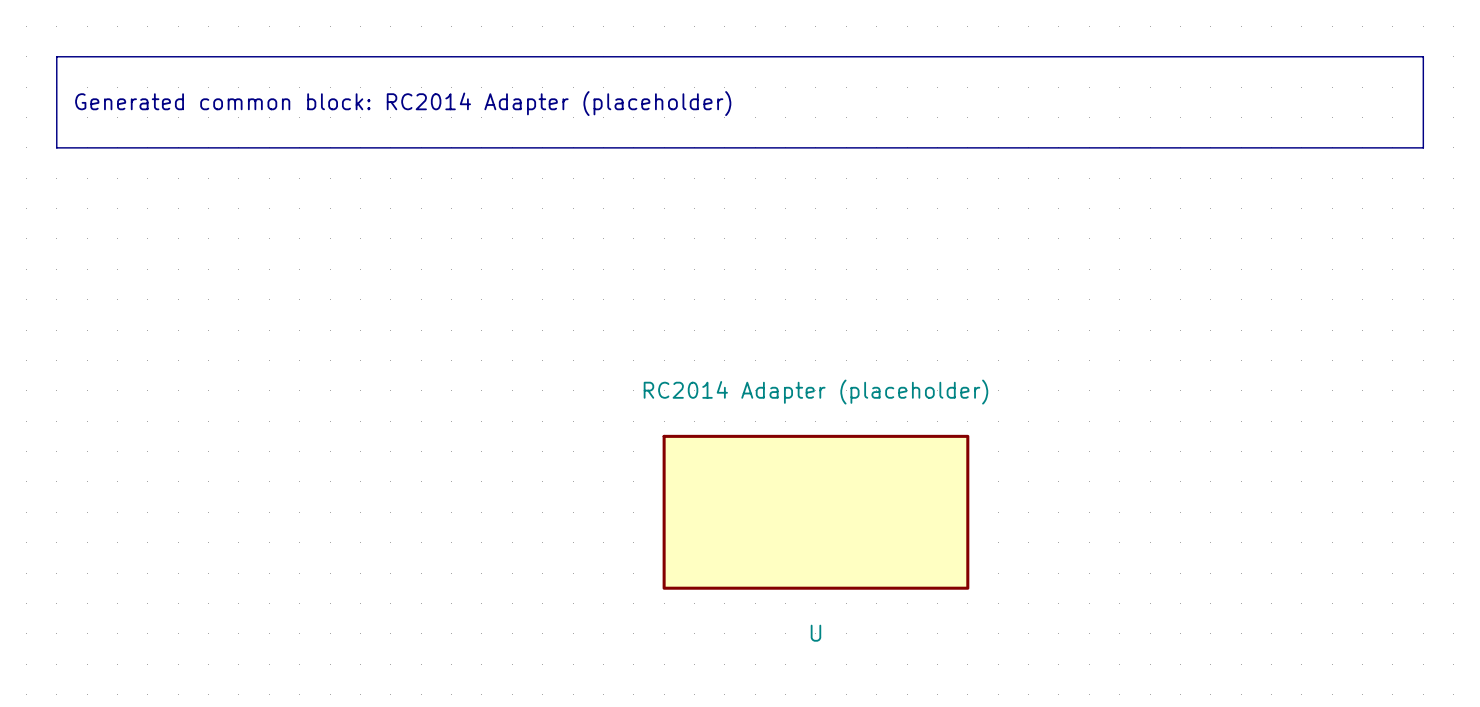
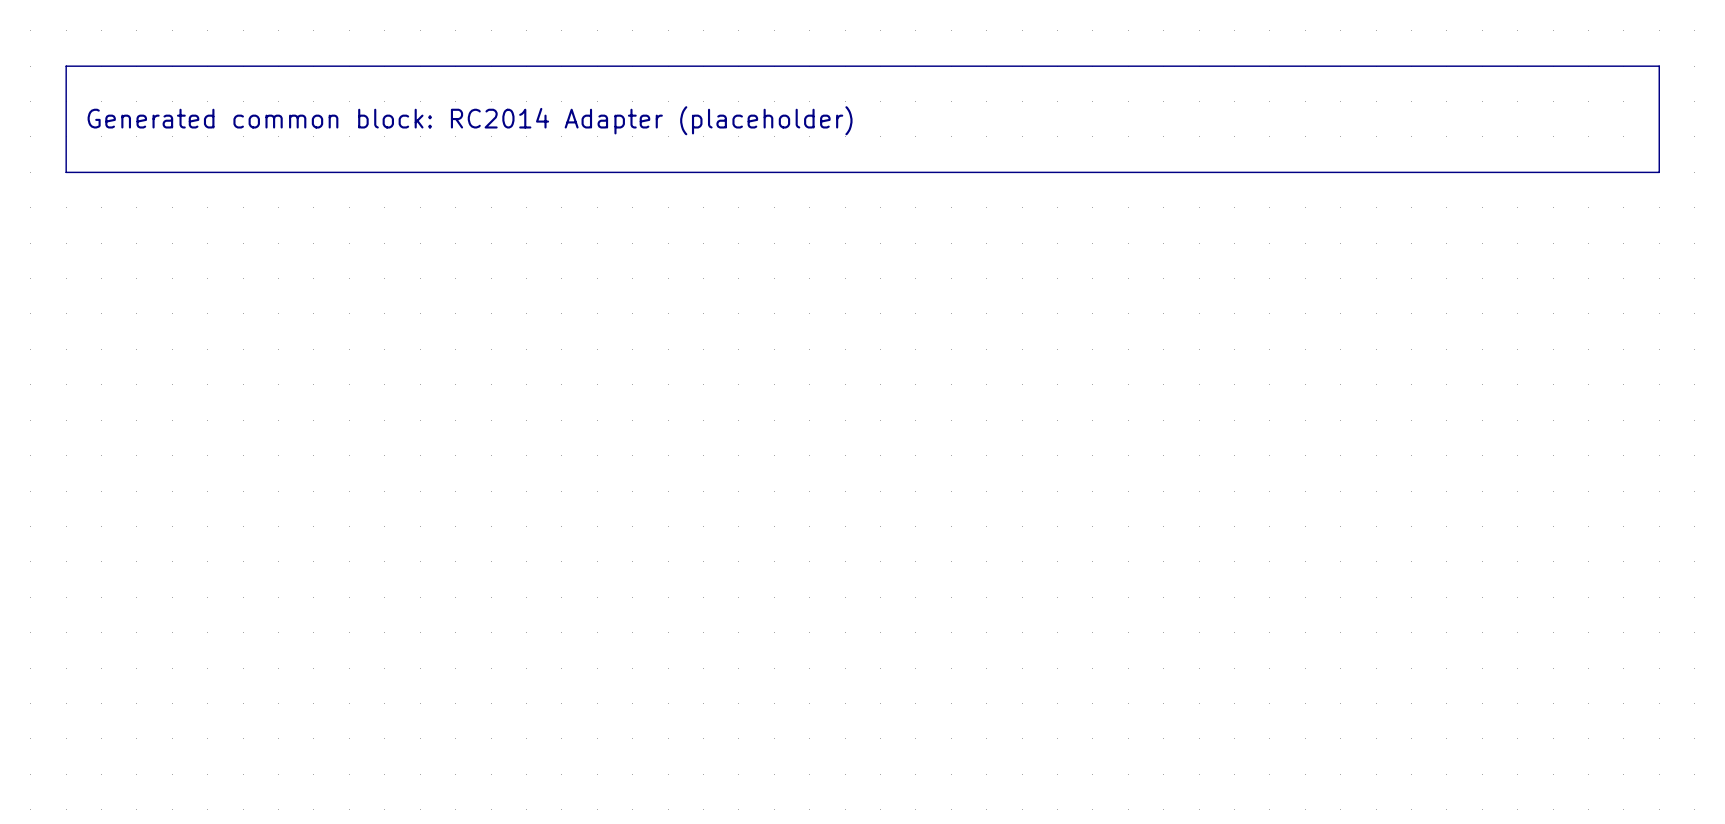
U: RC2014 Adapter (placeholder) (815, 512) -> none

